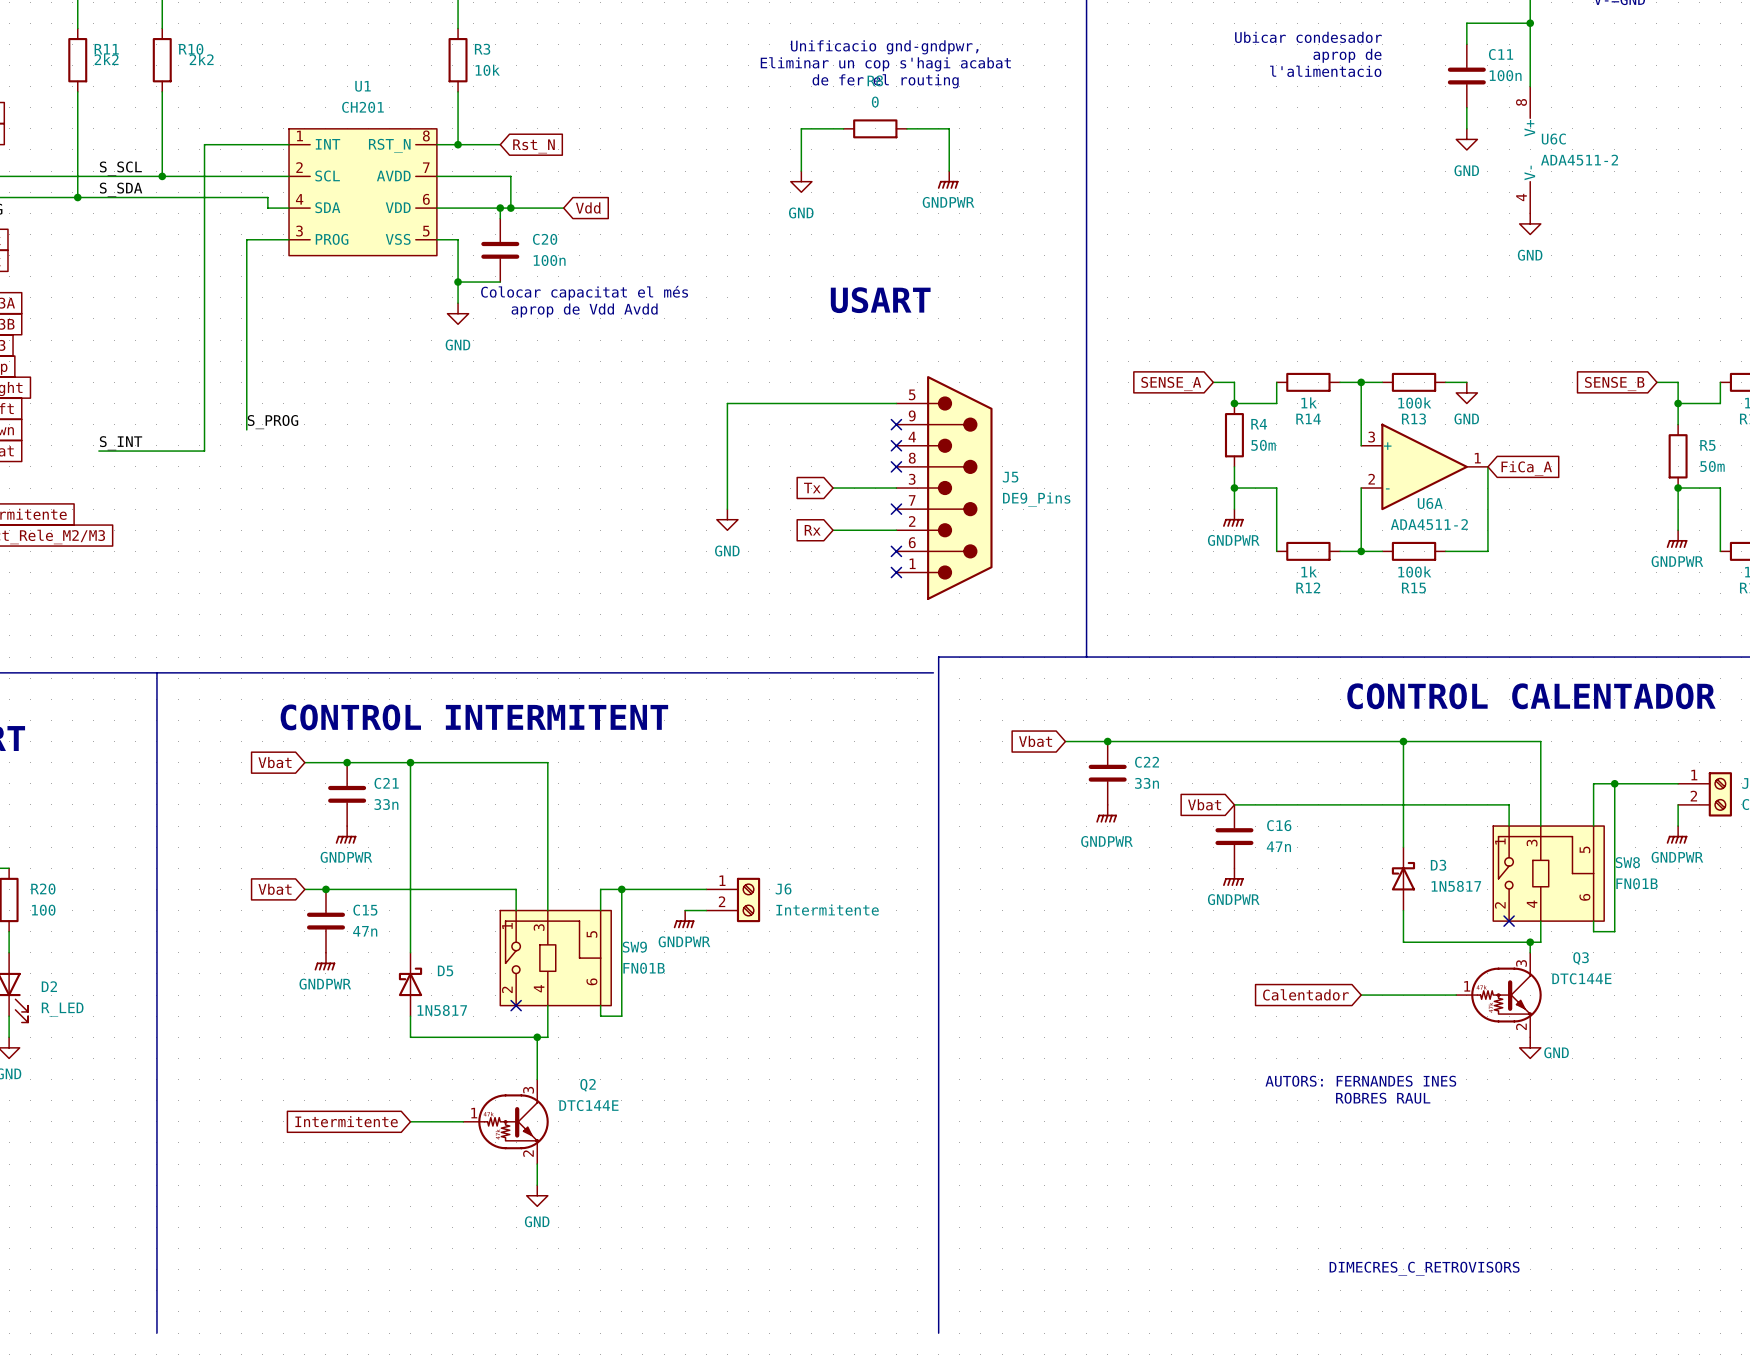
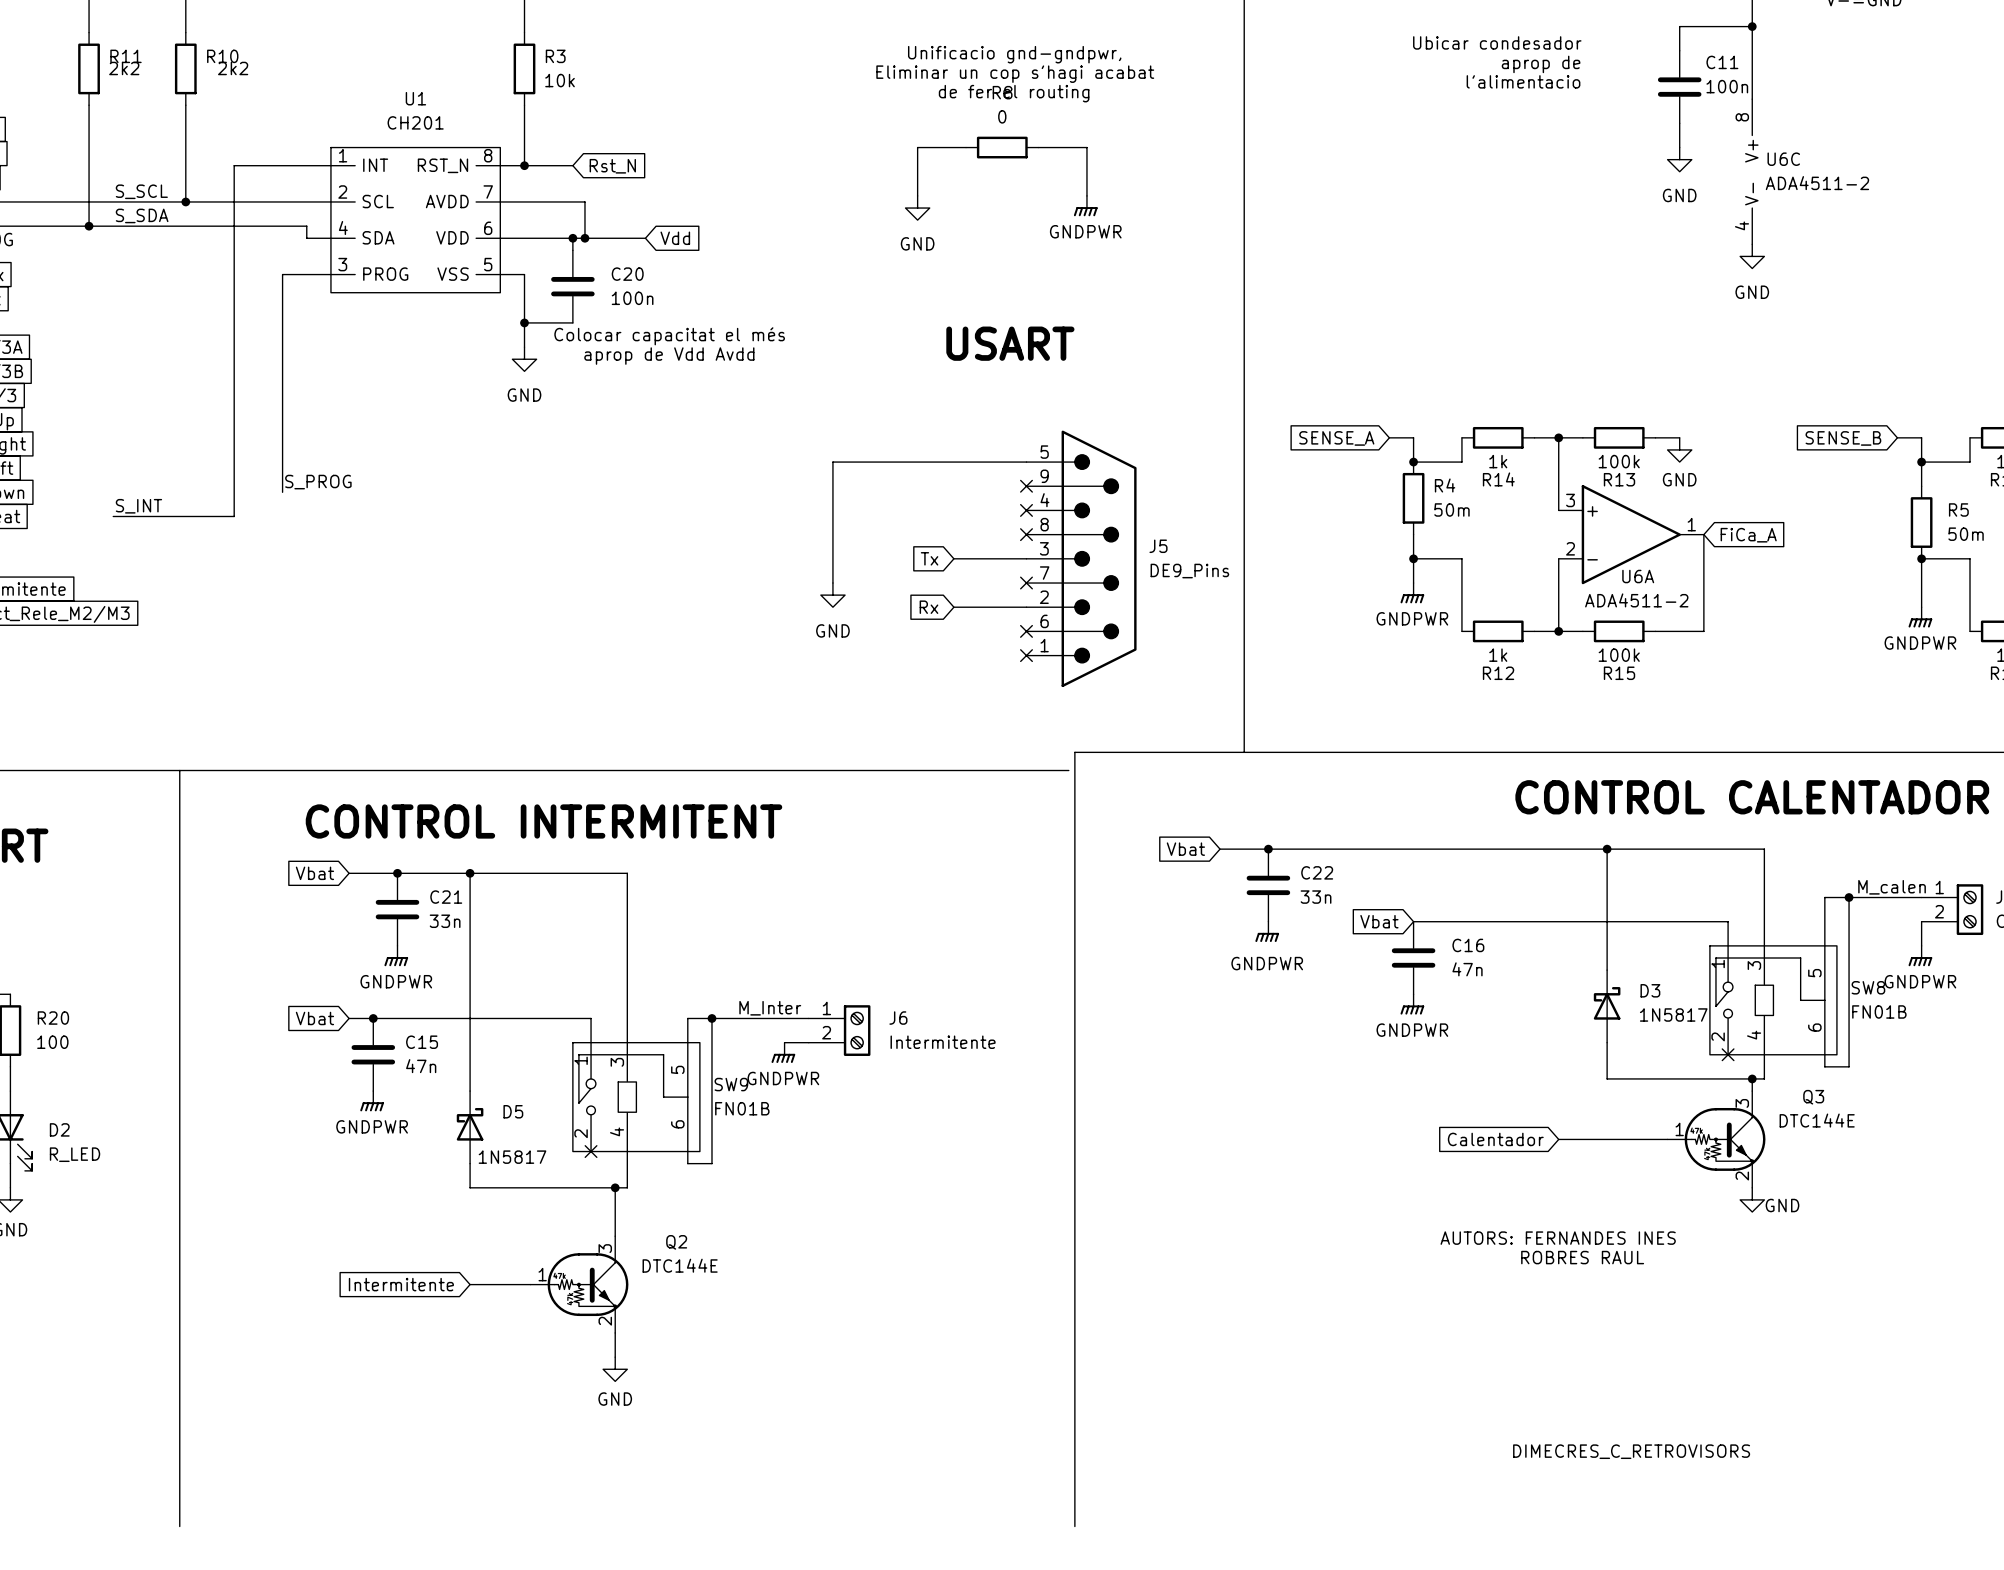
label: none -> M_calen (1892, 887)
label: none -> M_Inter (770, 1008)

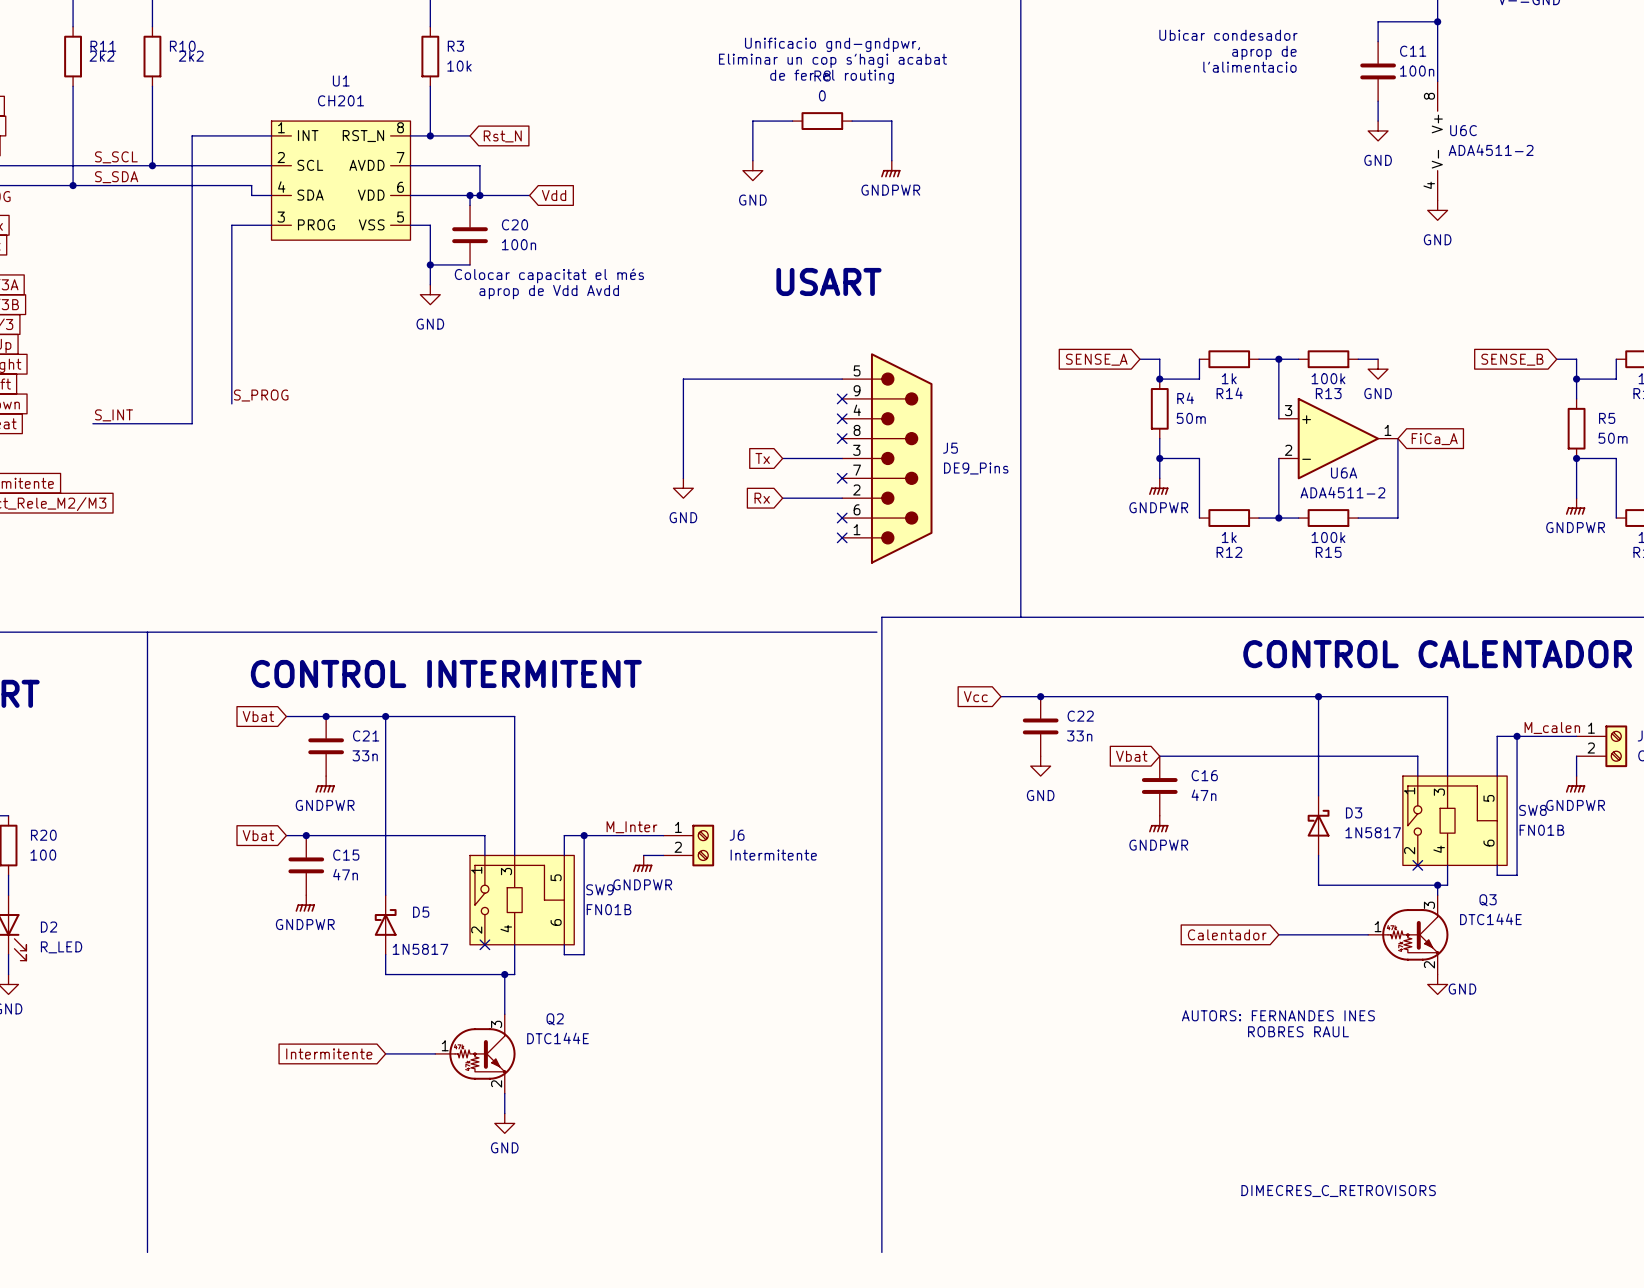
global label: Vbat (1185, 849) -> Vcc (975, 696)
power symbol: GNDPWR (1267, 931) -> GND (1040, 766)

